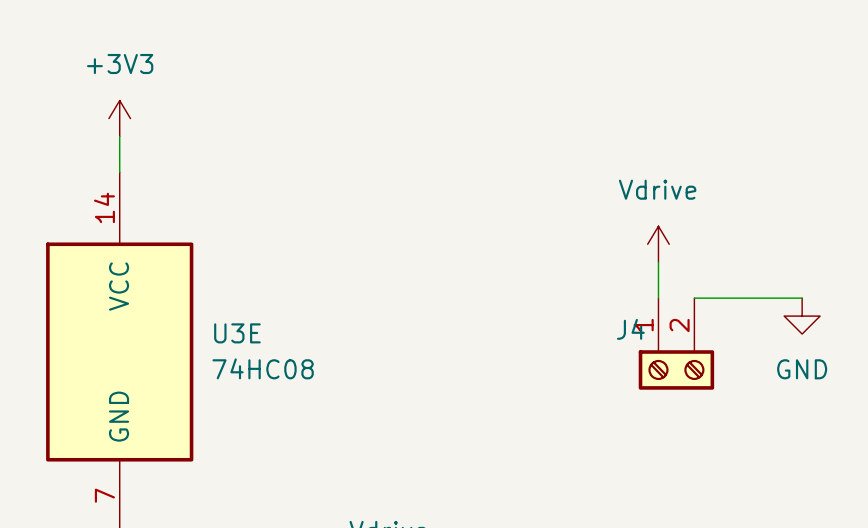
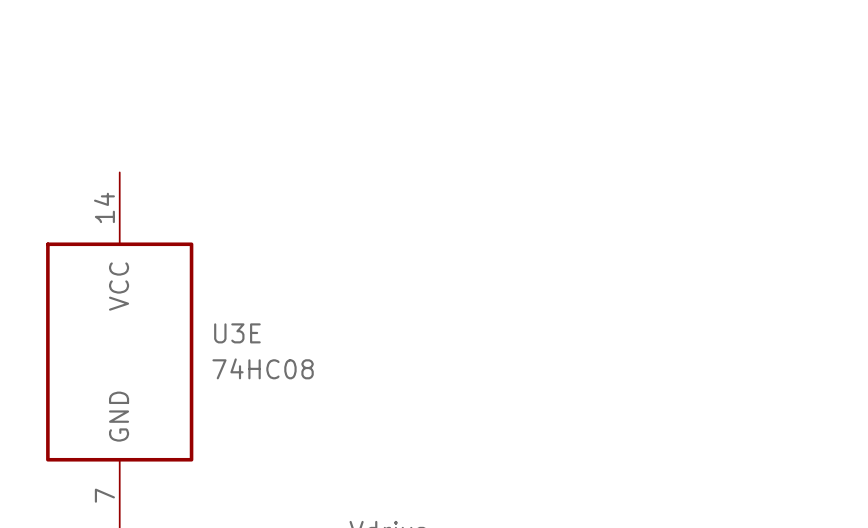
power symbol: +3V3 (119, 118) -> none
wire: (119, 136) (119, 172) -> none
power symbol: Vdrive (658, 244) -> none
wire: (658, 262) (658, 298) -> none
wire: (694, 298) (802, 298) -> none
power symbol: GND (802, 316) -> none
J4: (676, 343) -> none

